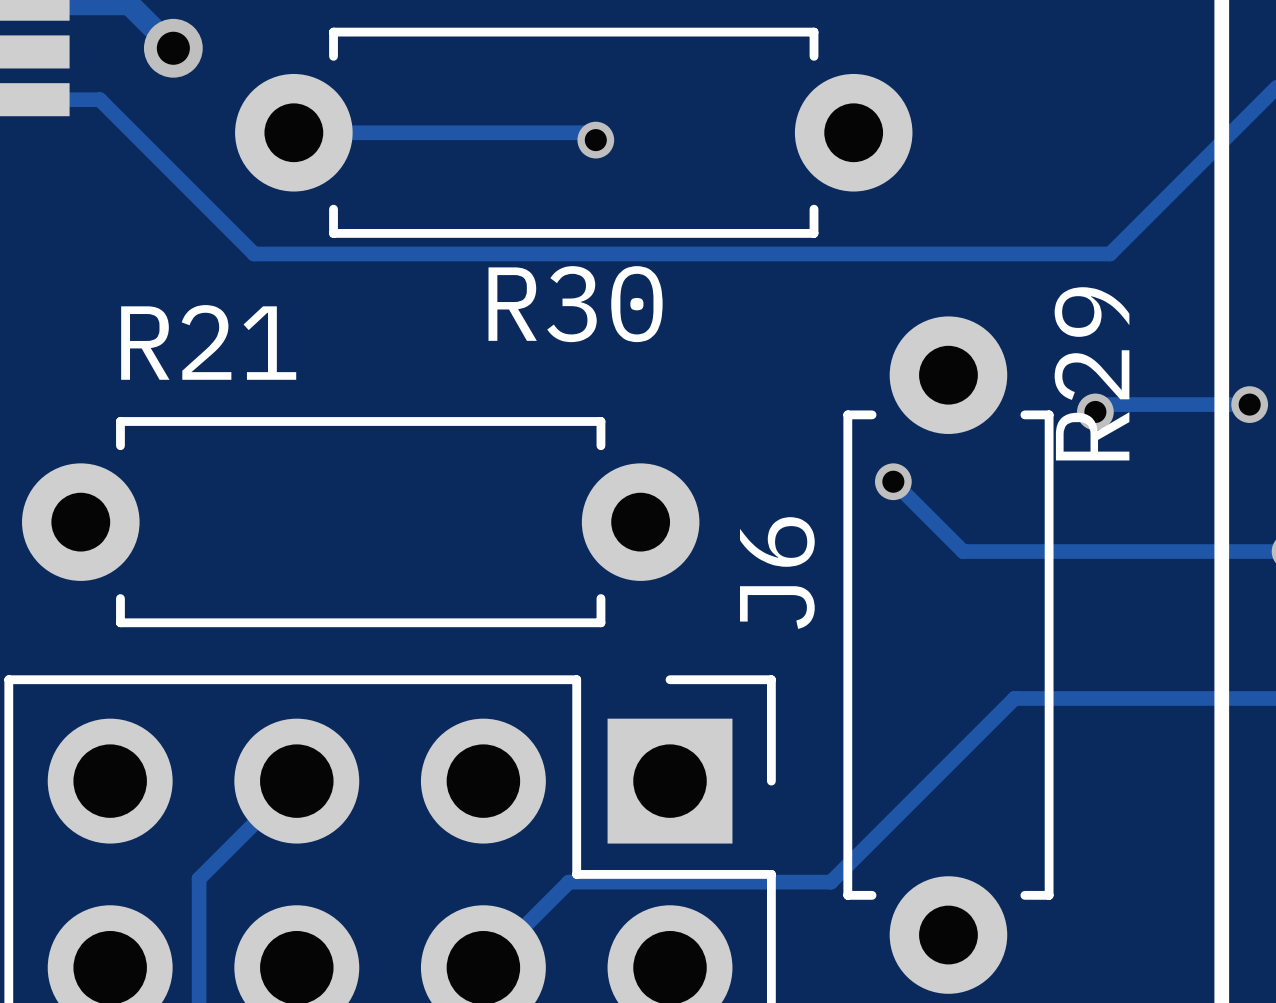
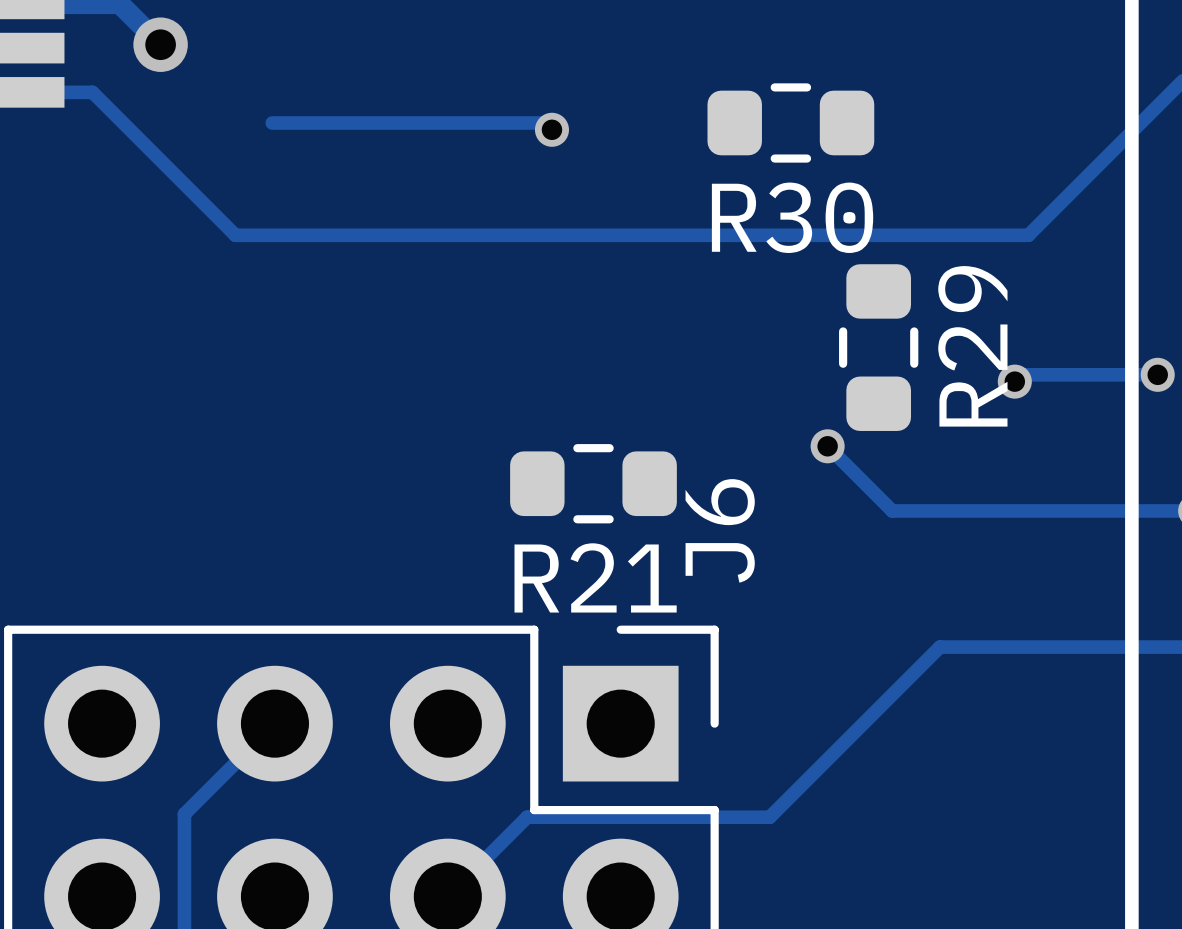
R30 footprint: [235, 27, 913, 238] -> [707, 83, 875, 163]
R29 footprint: [843, 316, 1054, 994] -> [839, 264, 919, 431]
R21 name position: R21 (208, 342) -> R21 (595, 577)
R29 name position: R29 (1092, 373) -> R29 (972, 346)
R21 footprint: [22, 417, 700, 628] -> [510, 444, 677, 524]

